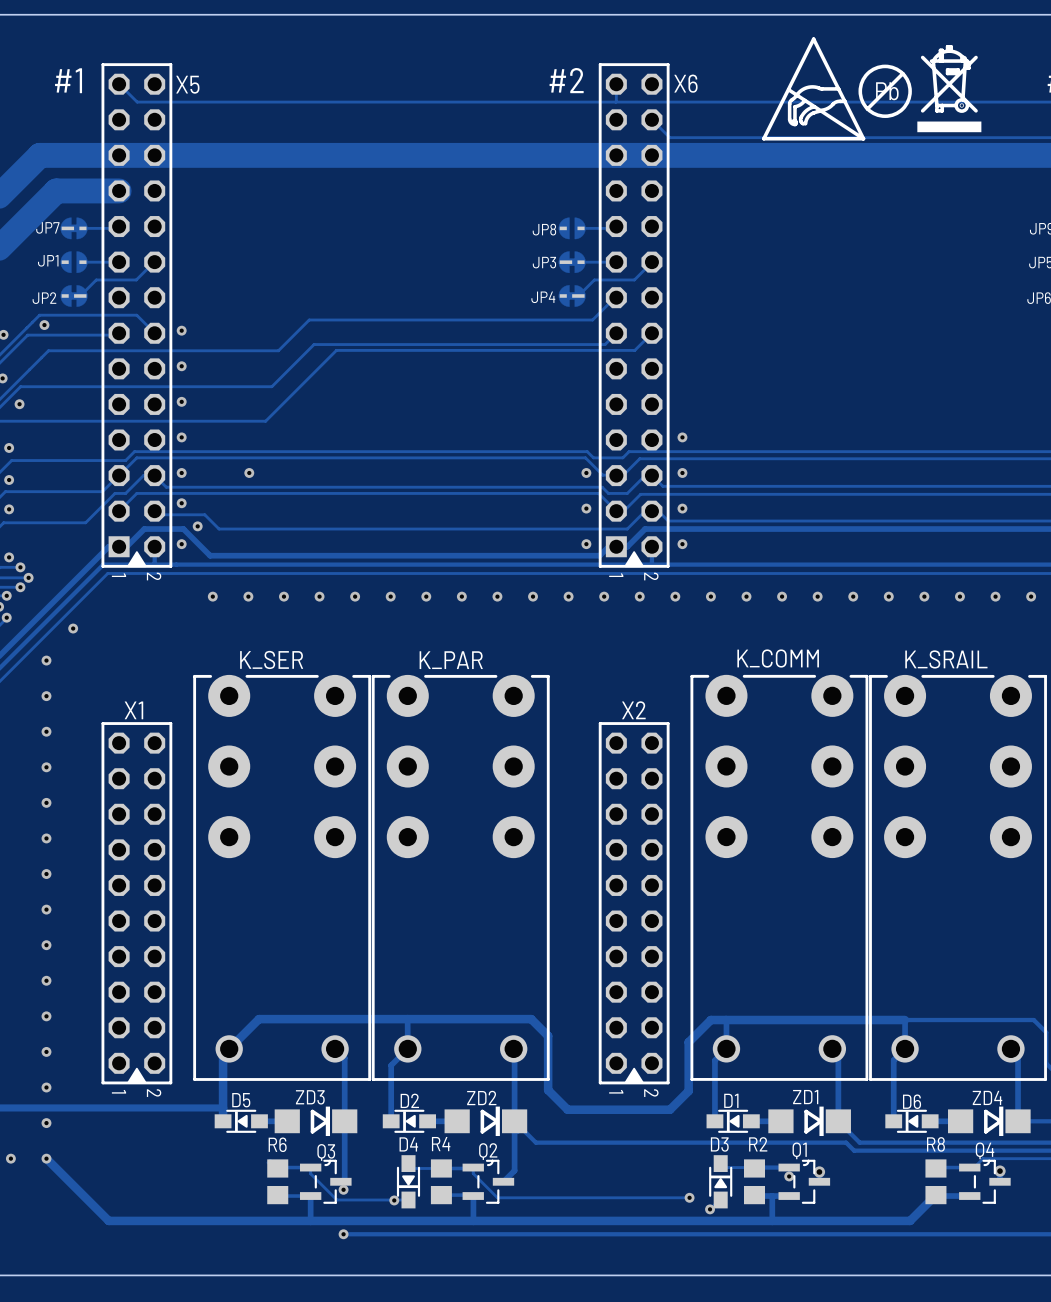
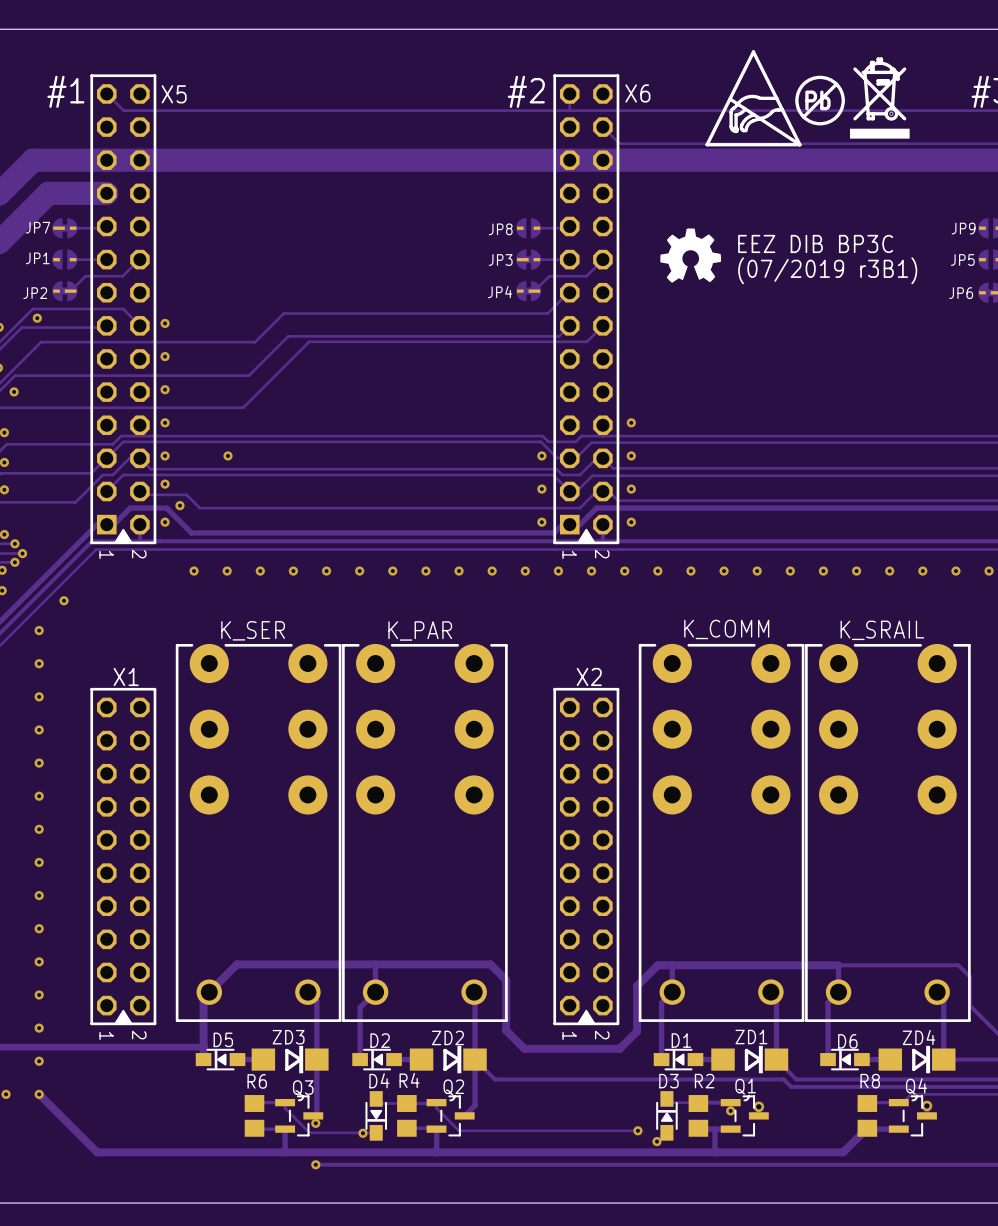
drawing: none -> [660, 228, 722, 283]
text: none -> EEZ DIB BP3C (815, 243)
text: none -> (07/2019 r3B1) (827, 270)

